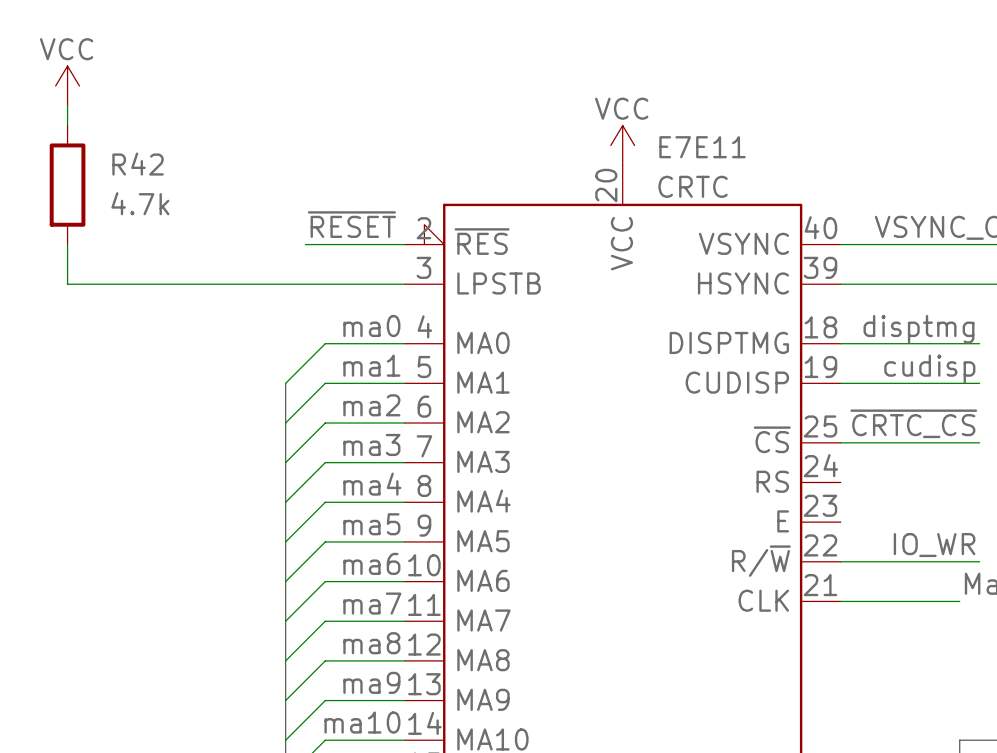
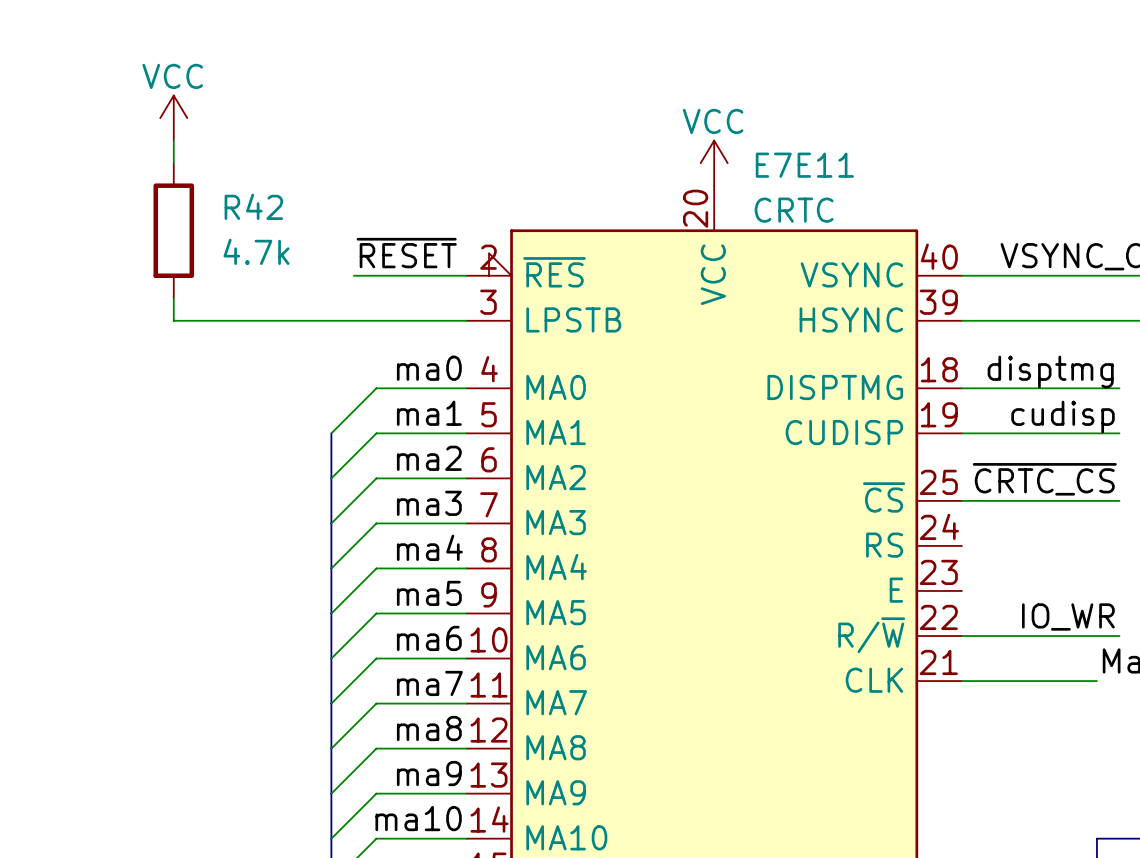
power symbol position: VCC (67, 85) -> VCC (173, 118)
wire: (67, 105) (67, 125) -> (173, 140) (173, 163)
R42 position: (67, 185) -> (173, 230)
wire: (67, 244) (67, 284) (146, 284) -> (173, 298) (173, 320)

